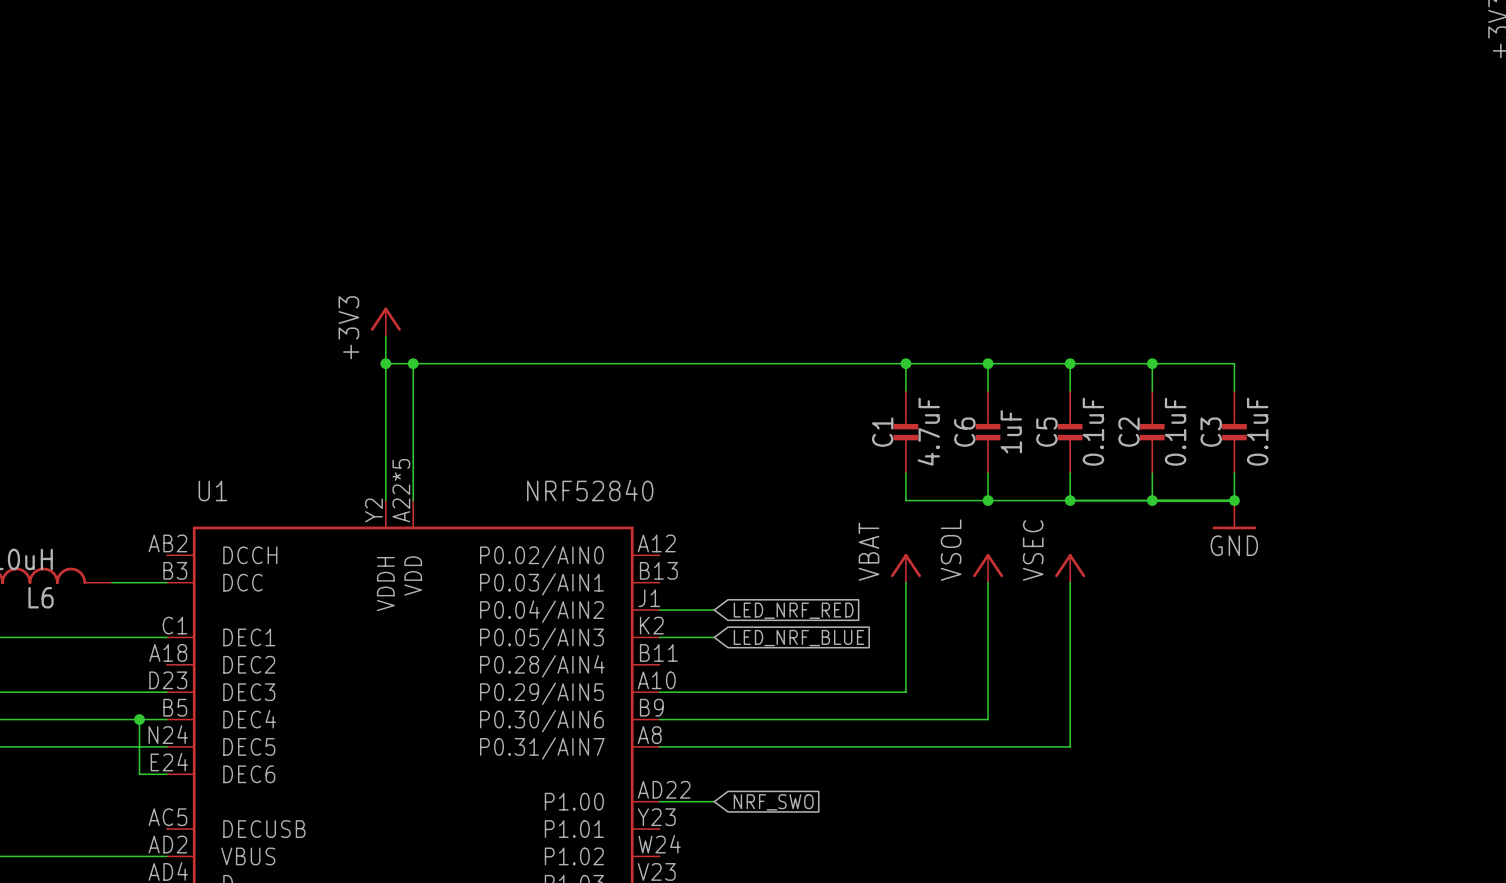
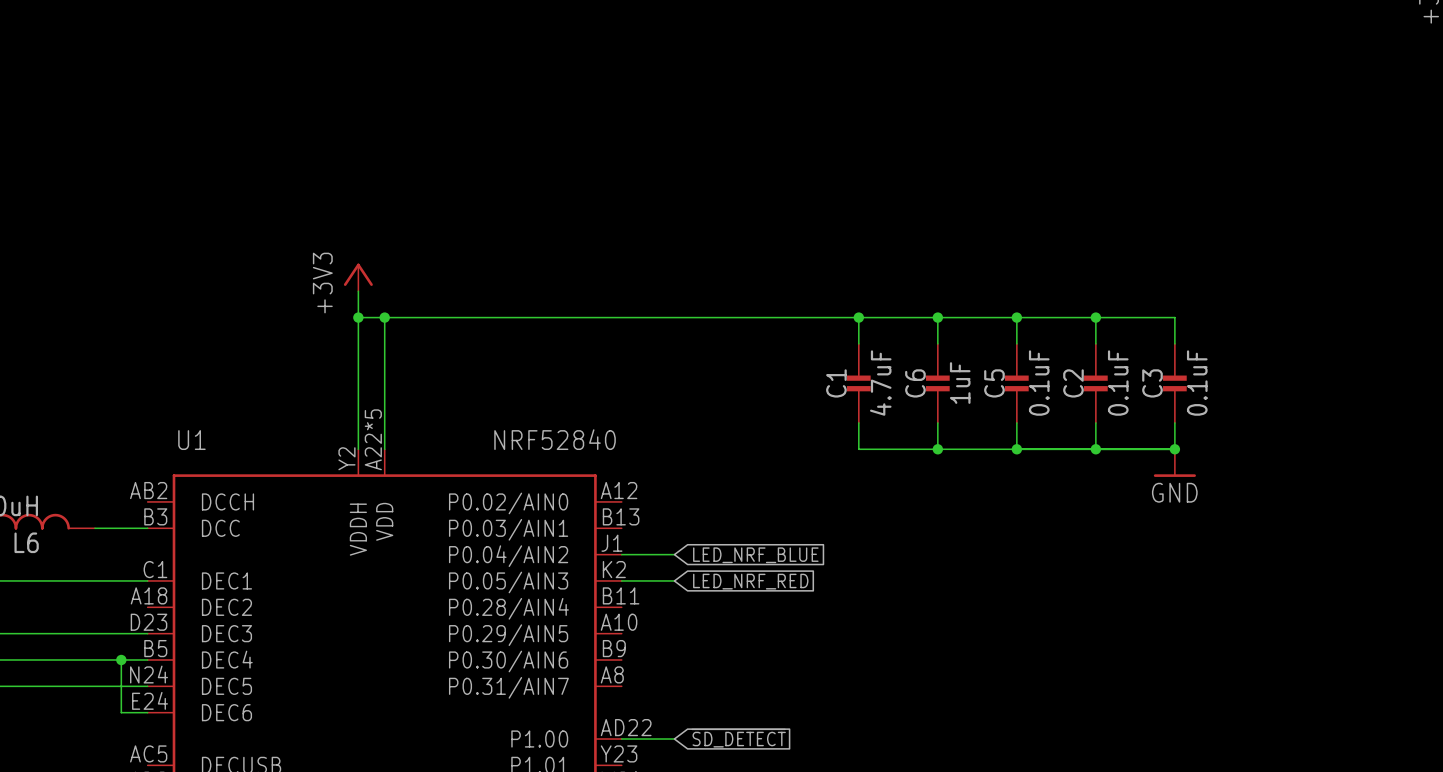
power symbol: VBAT (905, 568) -> none
power symbol: VSOL (988, 568) -> none
power symbol: VSEC (1070, 568) -> none
wire: (905, 582) (905, 692) (659, 692) -> none
wire: (988, 582) (988, 719) (659, 719) -> none
wire: (1070, 582) (1070, 746) (659, 746) -> none
global label: LED_NRF_RED (793, 610) -> LED_NRF_BLUE (755, 555)
global label: LED_NRF_BLUE (798, 638) -> LED_NRF_RED (750, 581)
global label: NRF_SWO (773, 802) -> ~{SD_DETECT} (738, 738)

